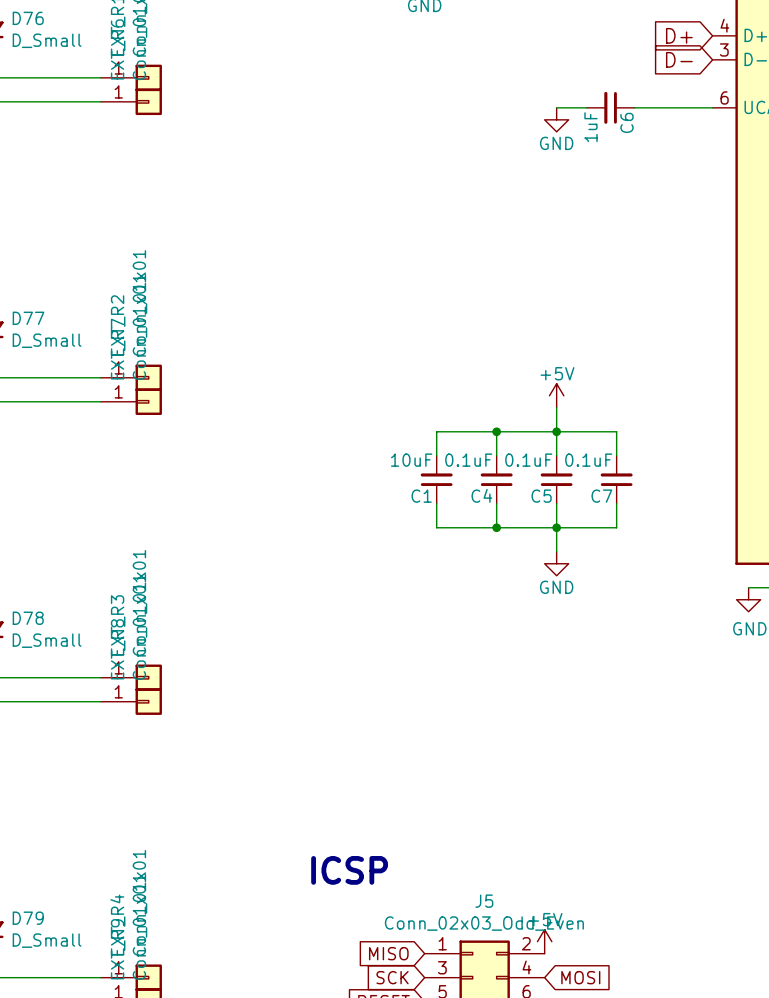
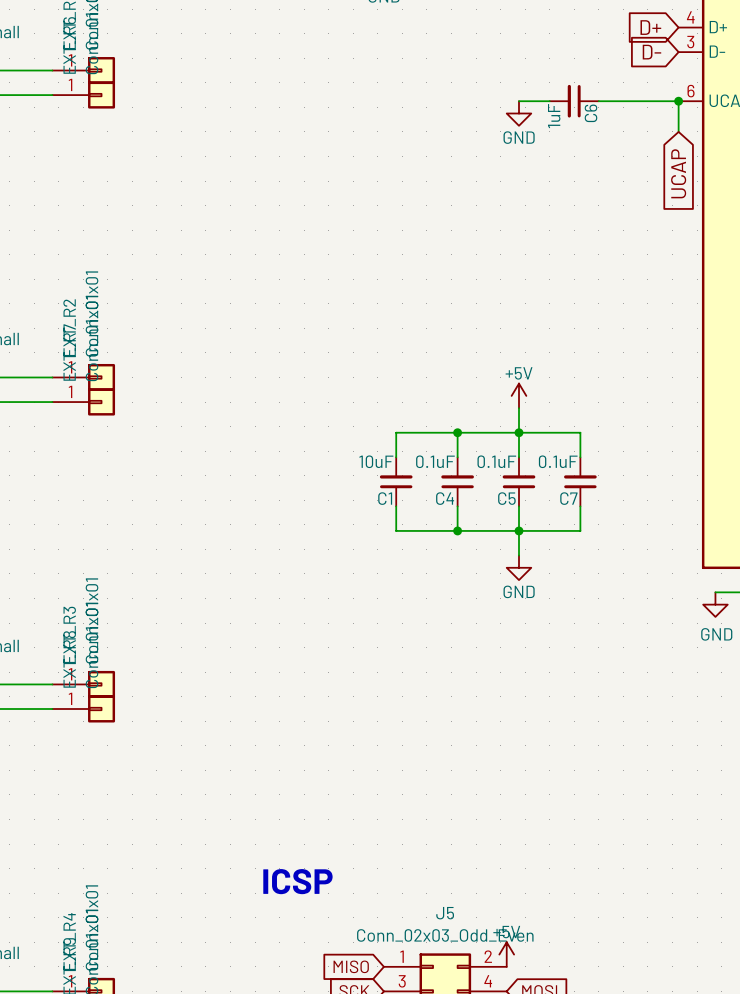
wire: none -> (678, 101) (678, 131)
junction: none -> (678, 101)
global label: none -> UCAP (678, 173)

